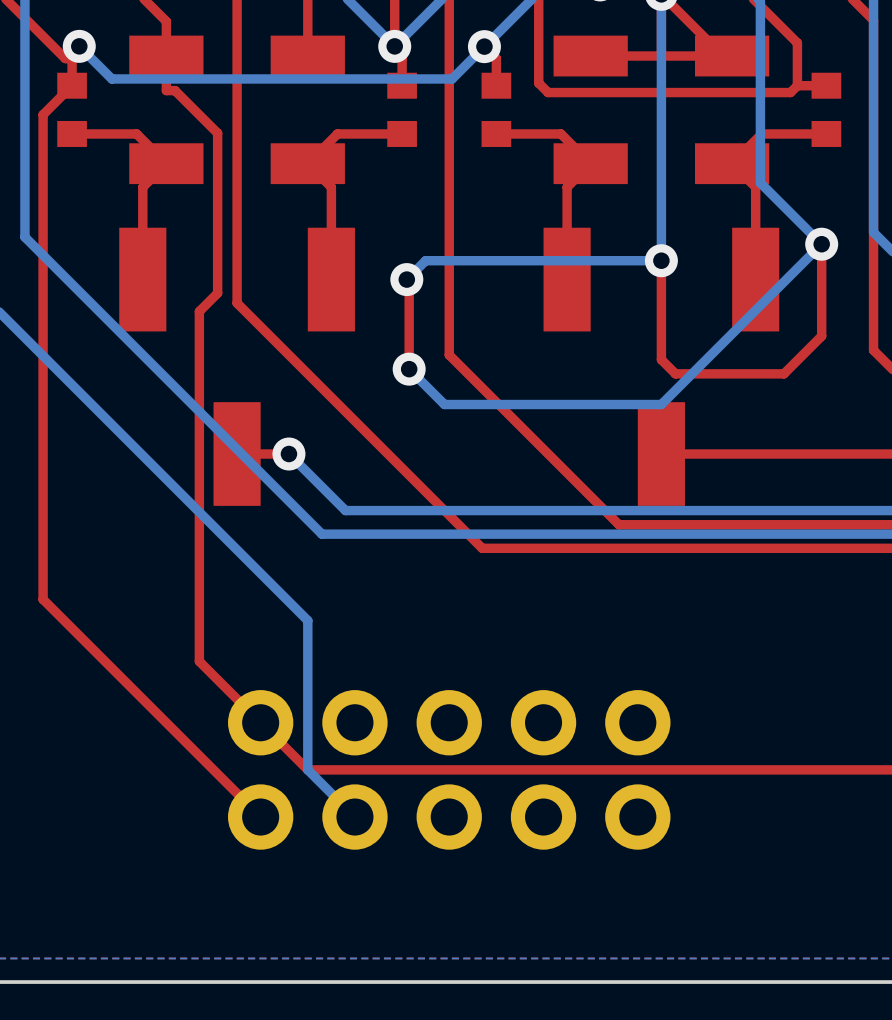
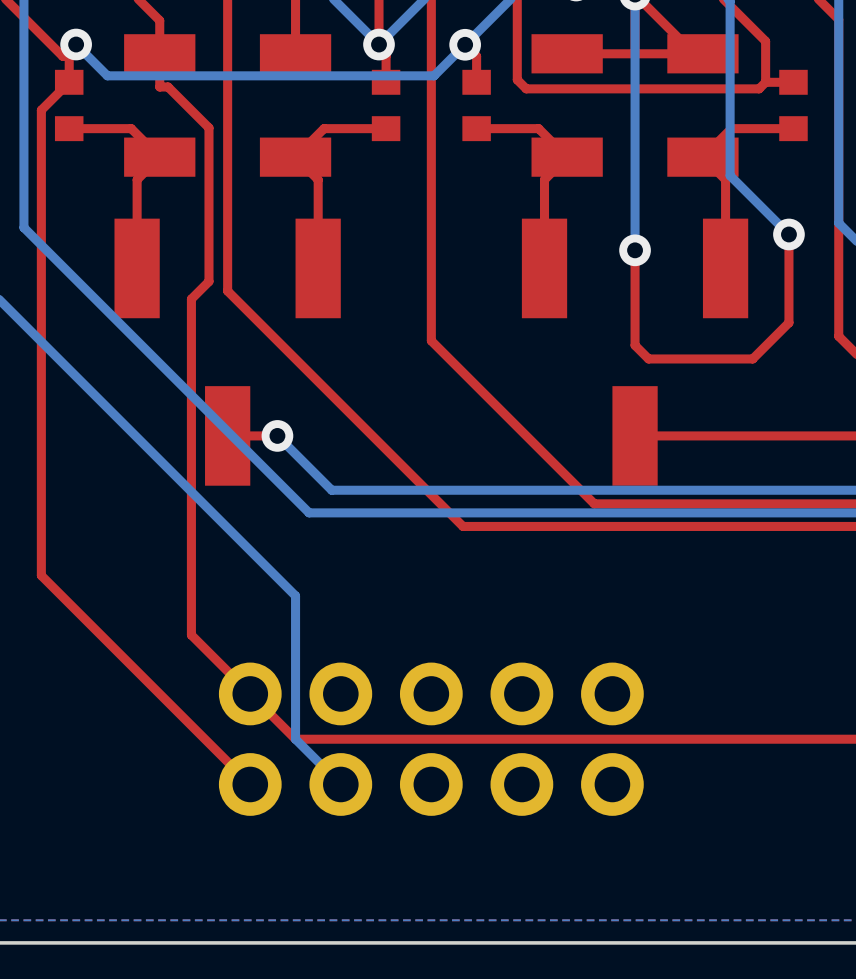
bottom track: (821, 244) (661, 404) (444, 404) (409, 369) -> none
bottom track: (661, 260) (425, 260) (406, 279) -> none
top track: (406, 279) (409, 281) (409, 369) -> none
via: (406, 279) -> none
via: (409, 369) -> none

